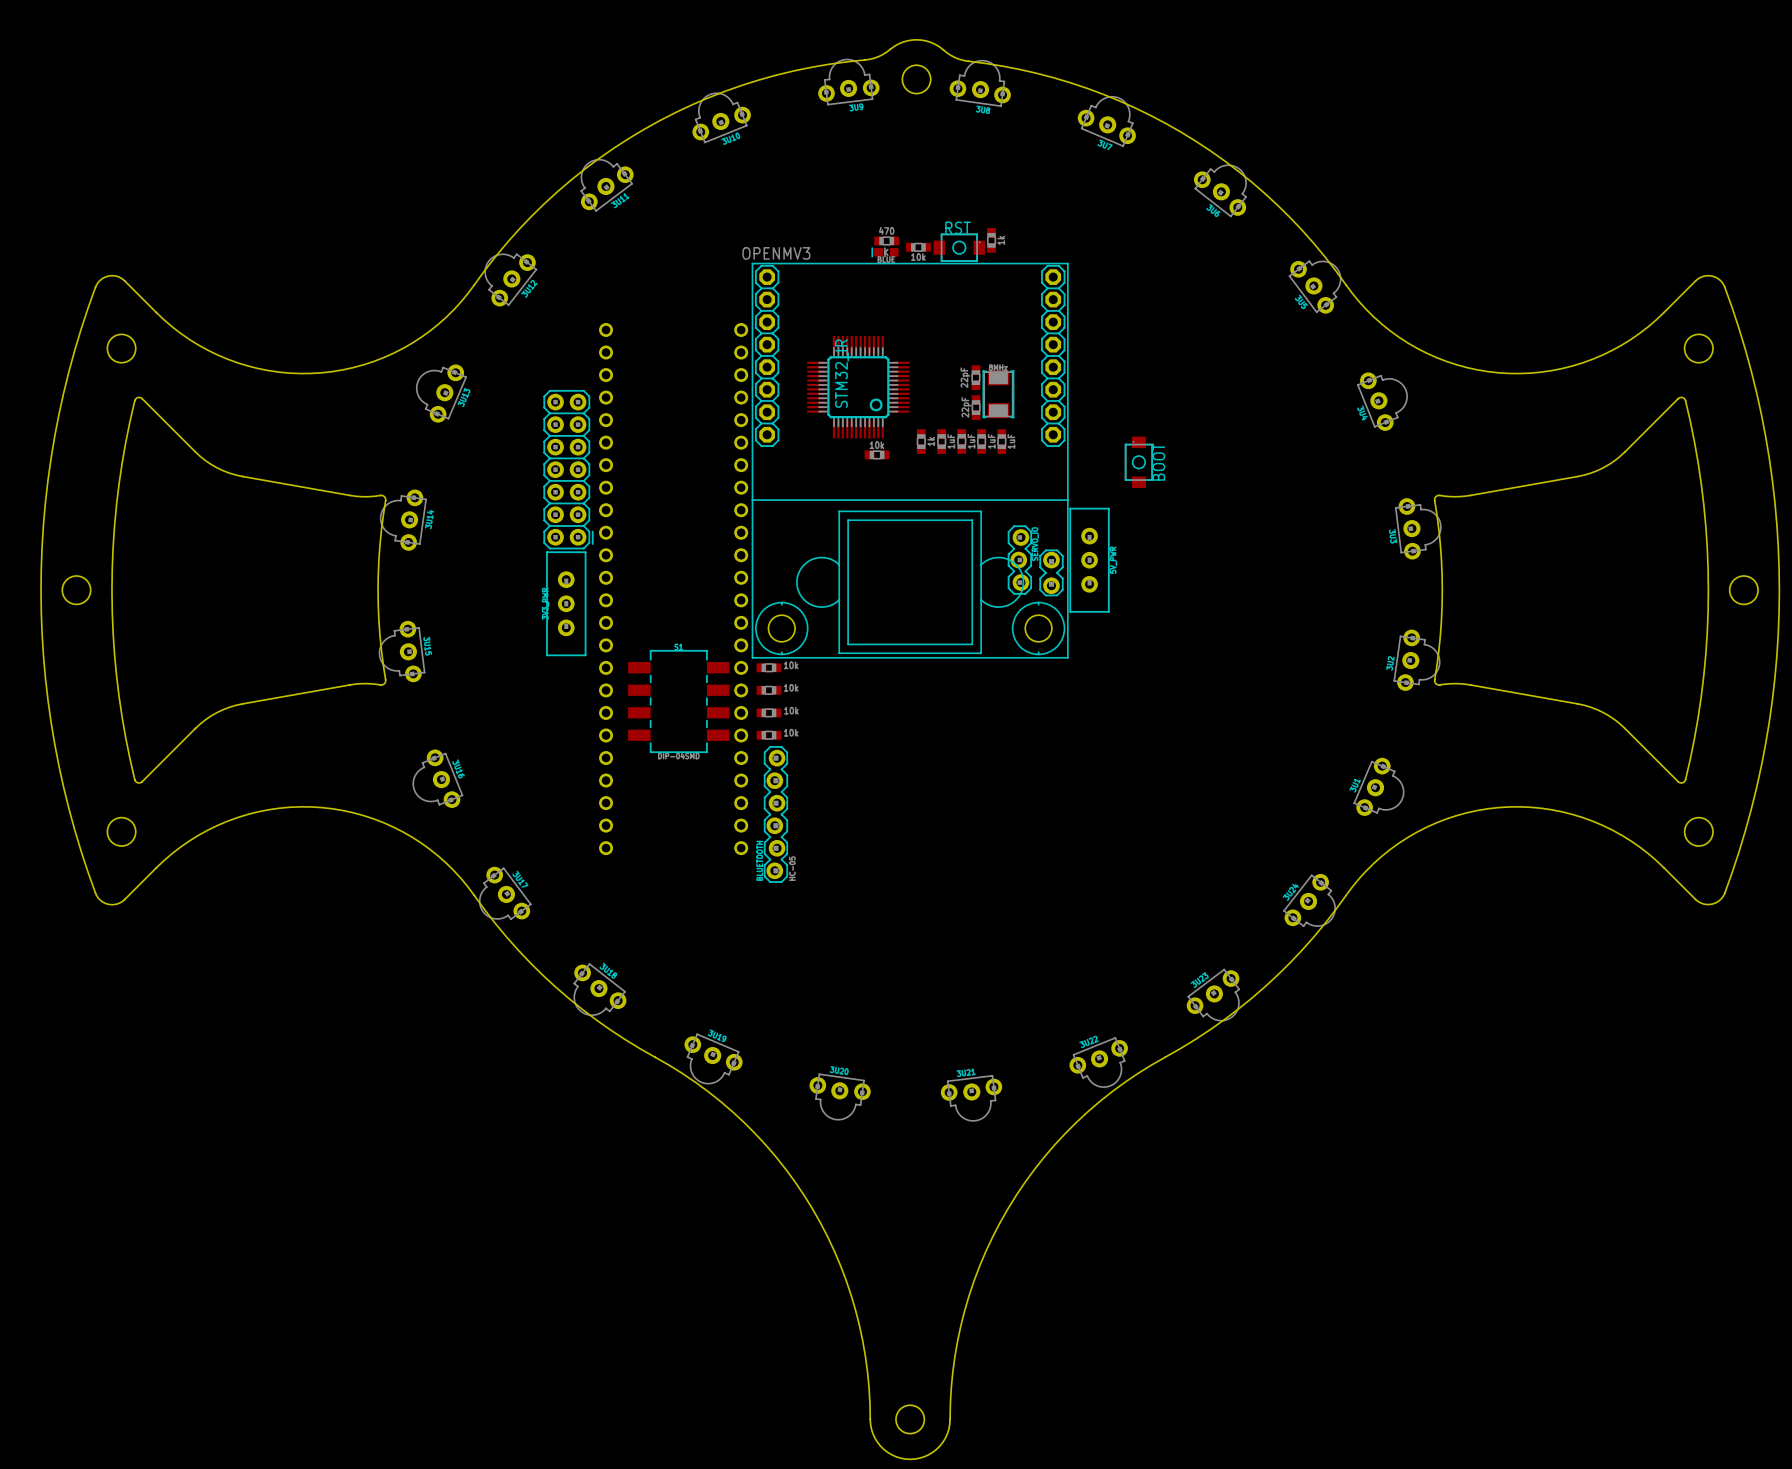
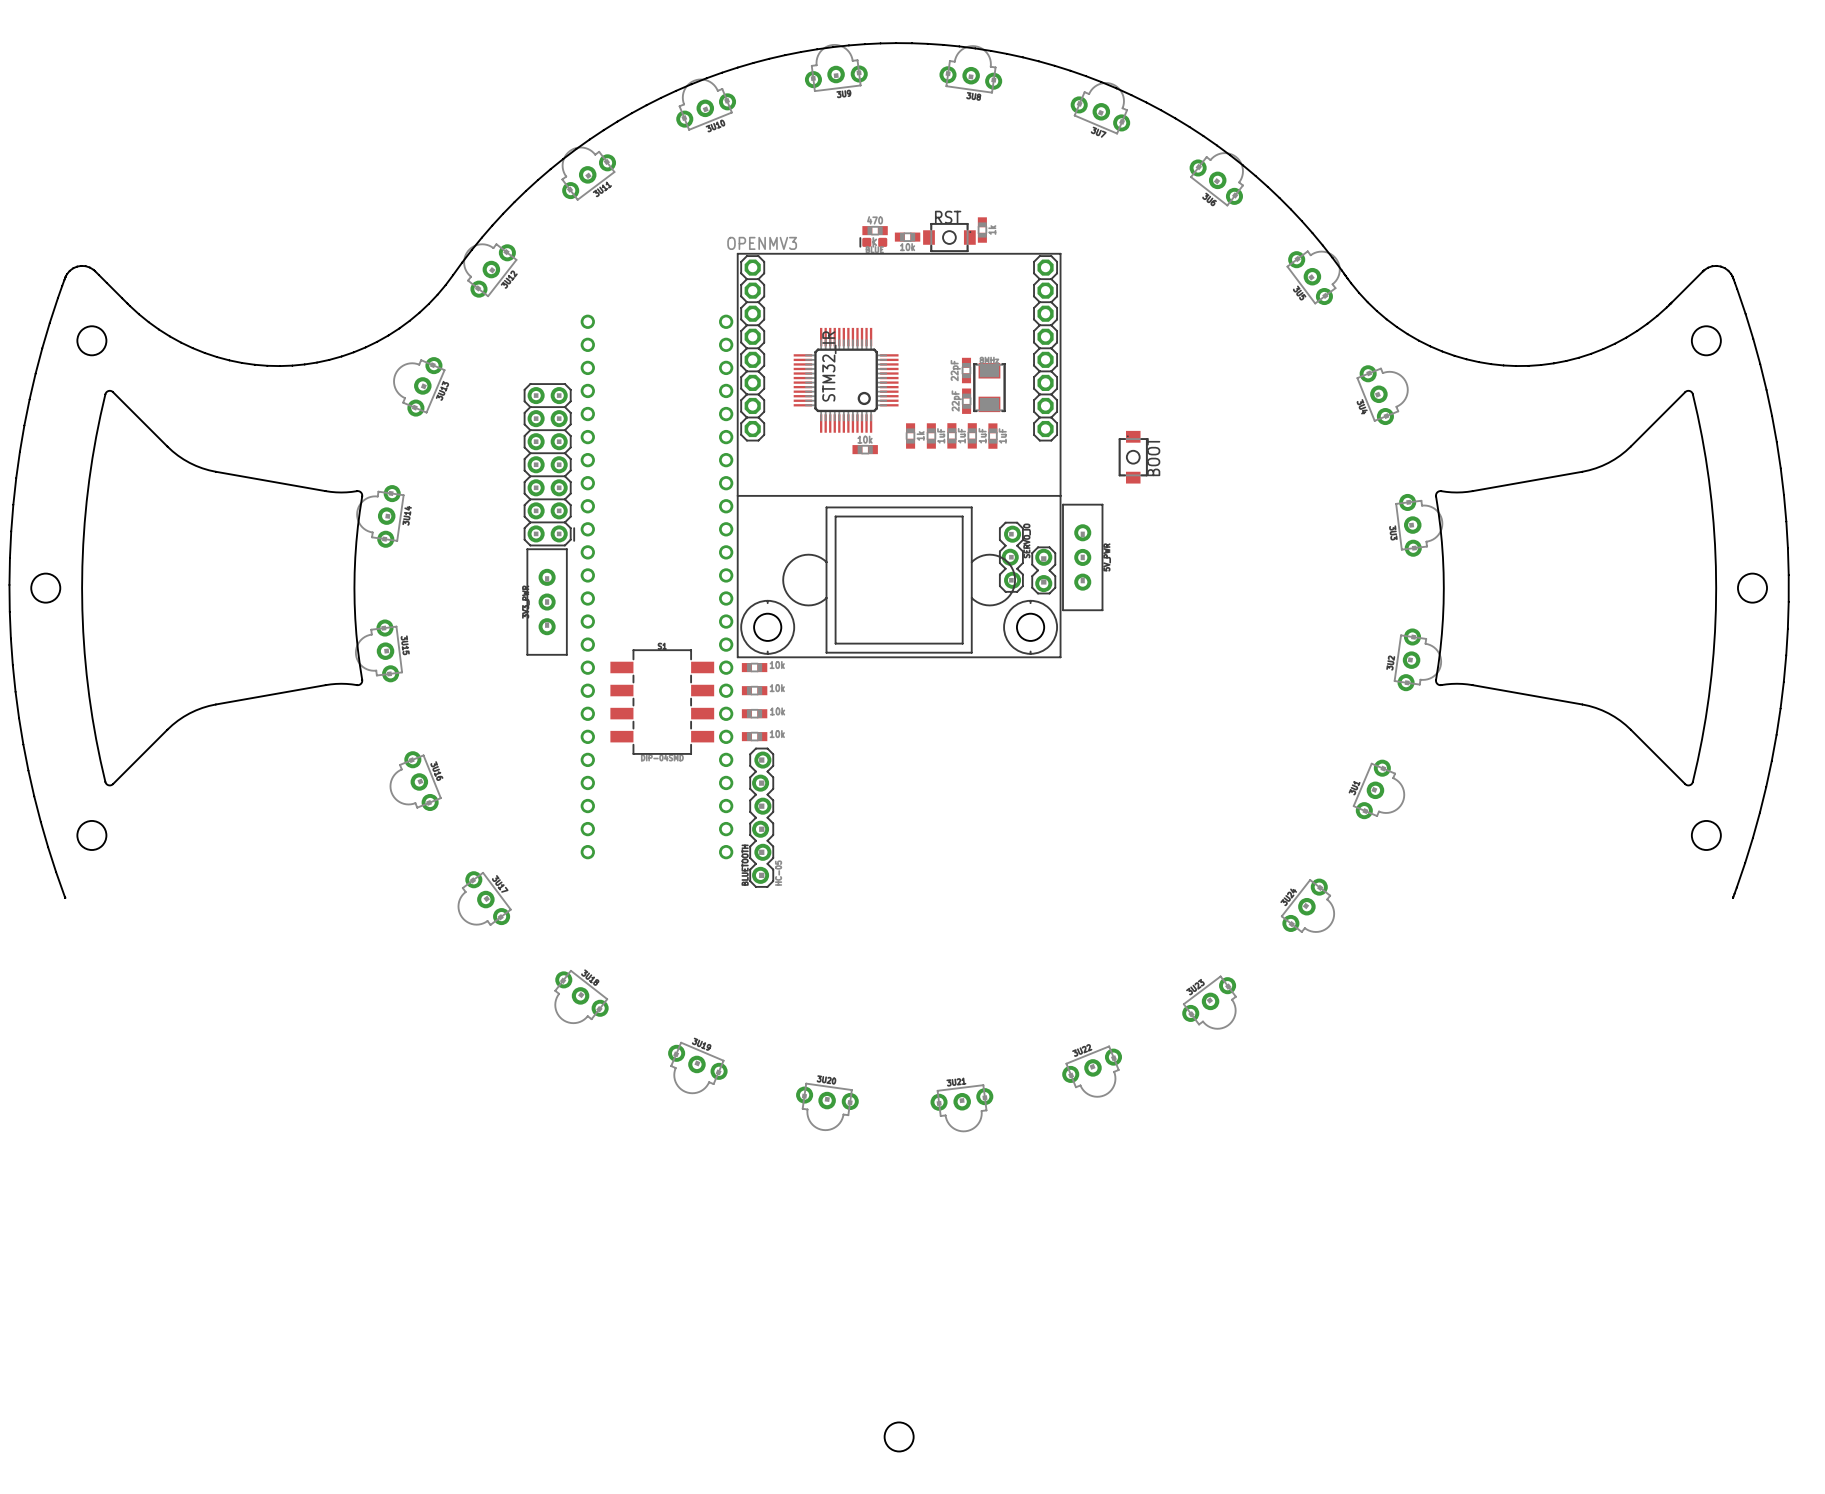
round board edge: [902, 65, 931, 94] -> none
board edge: none -> (65, 897) (40, 822) (23, 744) (12, 665) (9, 584) (13, 504) (24, 425) (42, 348) (62, 285) (69, 270) (81, 265) (89, 267) (148, 322) (181, 342) (204, 352) (229, 360) (267, 365) (304, 364) (329, 359) (353, 352) (377, 341) (409, 320) (437, 294) (481, 237) (526, 190) (576, 149) (631, 113) (691, 84) (753, 62) (817, 49) (896, 43) (975, 48) (1038, 61) (1101, 82) (1161, 110) (1216, 145) (1267, 186) (1312, 233) (1359, 292) (1386, 319) (1418, 340) (1442, 351) (1466, 359) (1491, 364) (1528, 365) (1566, 360) (1591, 353) (1615, 343) (1647, 323) (1708, 267) (1716, 265) (1728, 270) (1734, 283) (1753, 338) (1772, 415) (1783, 494) (1788, 575) (1786, 655) (1776, 734) (1759, 812) (1733, 897)
board edge: (870, 1419) (865, 1356) (851, 1295) (834, 1250) (820, 1222) (786, 1169) (755, 1133) (708, 1091) (682, 1073) (610, 1030) (555, 986) (506, 937) (454, 870) (421, 843) (383, 822) (353, 812) (311, 806) (268, 809) (227, 821) (189, 840) (164, 860) (119, 903) (108, 904) (97, 897) (74, 830) (54, 744) (43, 656) (41, 590) (43, 523) (54, 436) (74, 350) (97, 283) (108, 276) (121, 278) (180, 333) (217, 354) (247, 365) (279, 372) (311, 373) (332, 371) (363, 364) (403, 348) (438, 324) (461, 301) (507, 242) (544, 203) (599, 158) (644, 128) (692, 104) (742, 85) (811, 67) (874, 58) (898, 44) (917, 39) (935, 44) (959, 59) (1019, 69) (1086, 88) (1135, 107) (1181, 132) (1224, 161) (1278, 205) (1313, 243) (1359, 301) (1381, 324) (1417, 348) (1456, 364) (1487, 371) (1519, 373) (1551, 370) (1582, 362) (1612, 350) (1639, 333) (1699, 278) (1707, 275) (1718, 278) (1724, 287) (1739, 329) (1761, 414) (1774, 501) (1779, 590) (1776, 656) (1765, 744) (1745, 830) (1722, 897) (1711, 904) (1699, 902) (1656, 860) (1630, 840) (1592, 821) (1551, 809) (1509, 806) (1477, 810) (1436, 822) (1407, 837) (1381, 856) (1366, 870) (1313, 937) (1264, 986) (1209, 1030) (1137, 1073) (1112, 1091) (1065, 1133) (1034, 1169) (1000, 1222) (974, 1280) (960, 1325) (954, 1356) (948, 1428) (940, 1445) (928, 1454) (919, 1458) (910, 1459) (896, 1456) (883, 1449) (877, 1442) (872, 1433) (870, 1419) -> none

